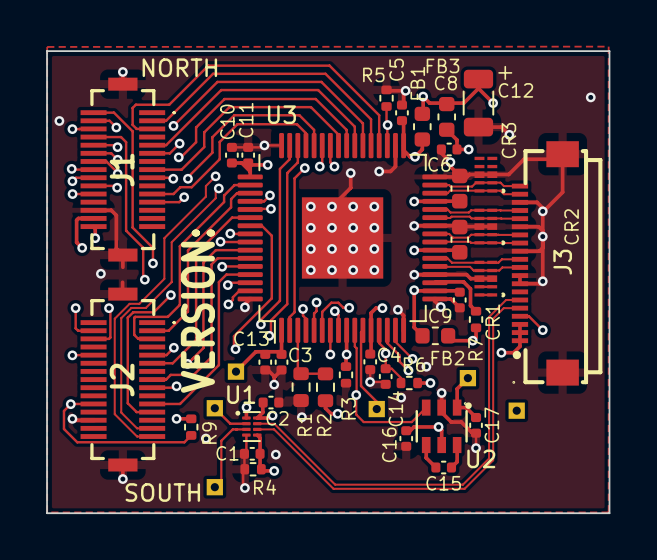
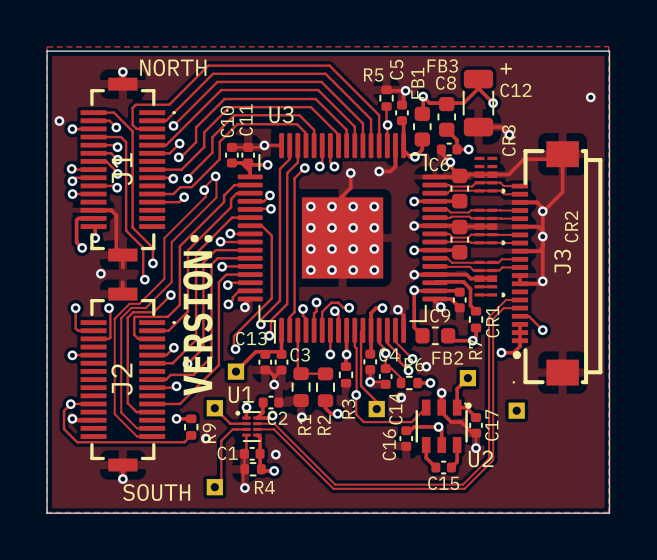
via position: (218, 188) -> (204, 190)
track: (215, 191) (215, 198) -> (216, 178) (215, 198)

